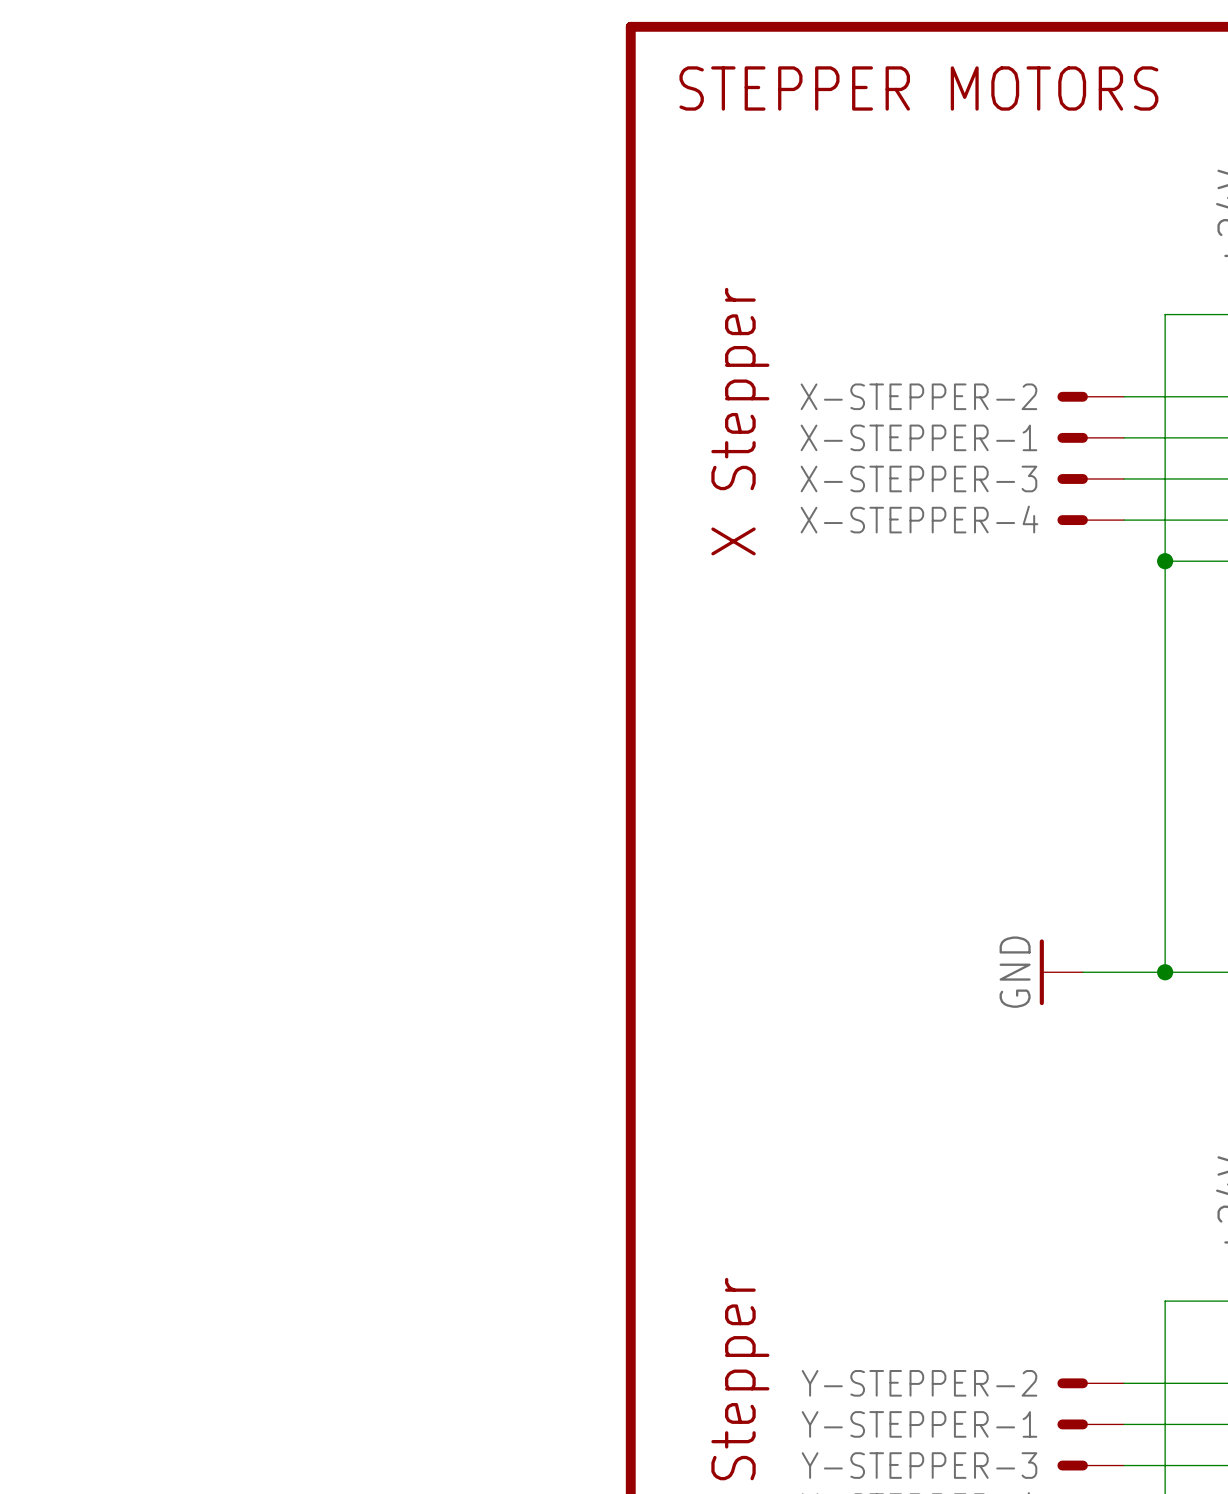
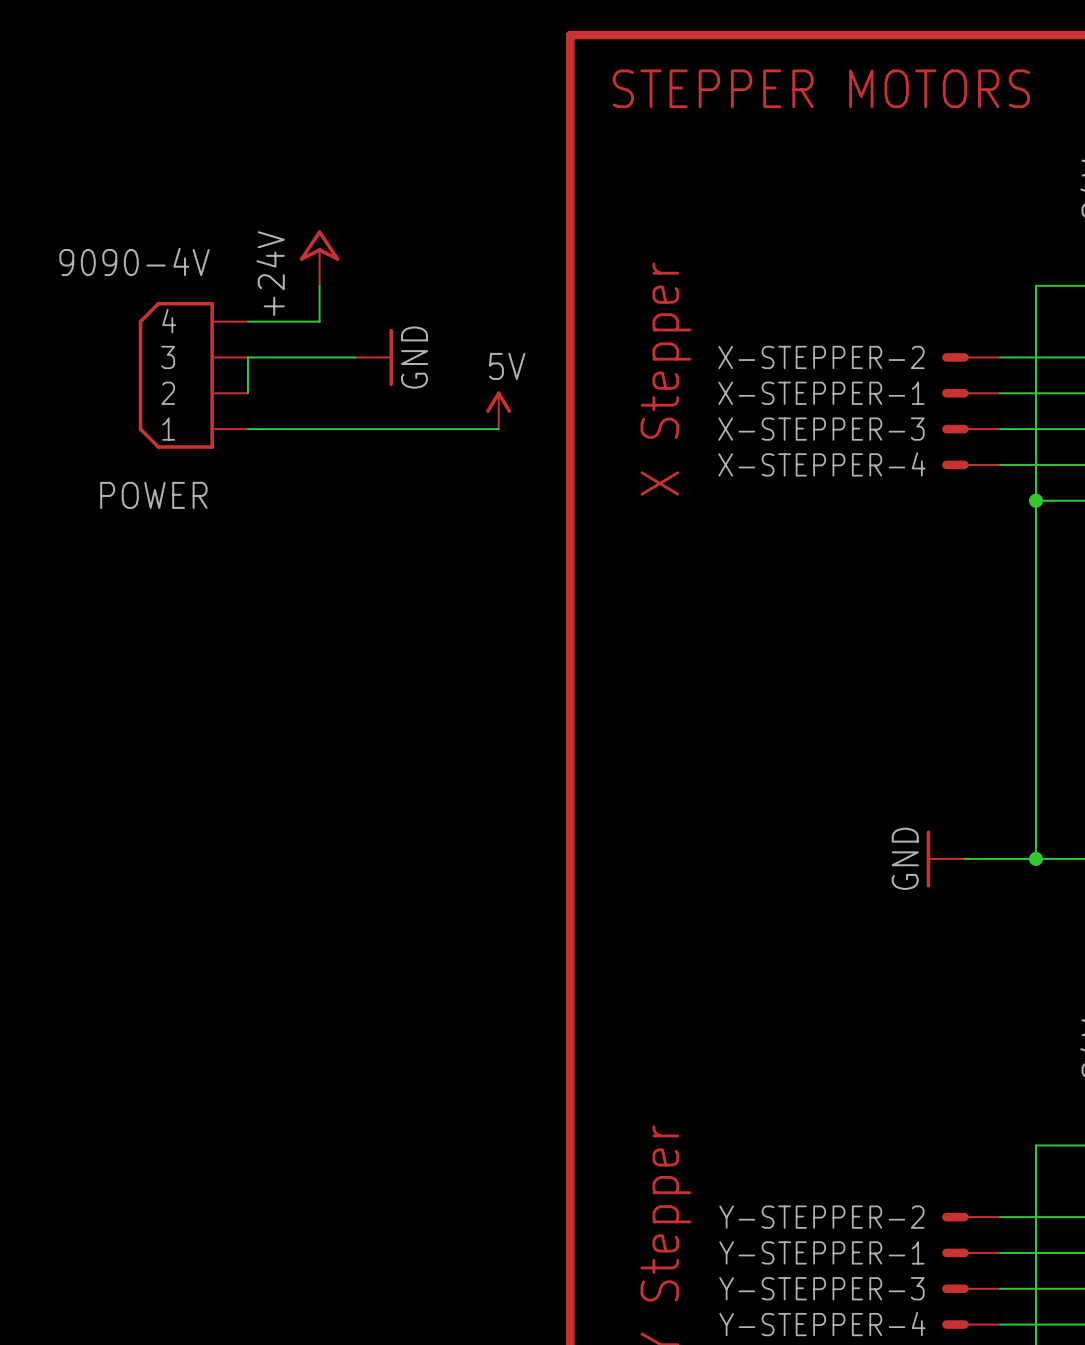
power symbol: none -> +24V (319, 258)
wire: none -> (319, 285) (319, 321) (247, 321)
wire: none -> (355, 357) (247, 357) (247, 393)
power symbol: none -> GND (374, 357)
POWER: none -> 9090-4V (193, 375)
power symbol: none -> 5V (498, 410)
wire: none -> (247, 429) (498, 429)

